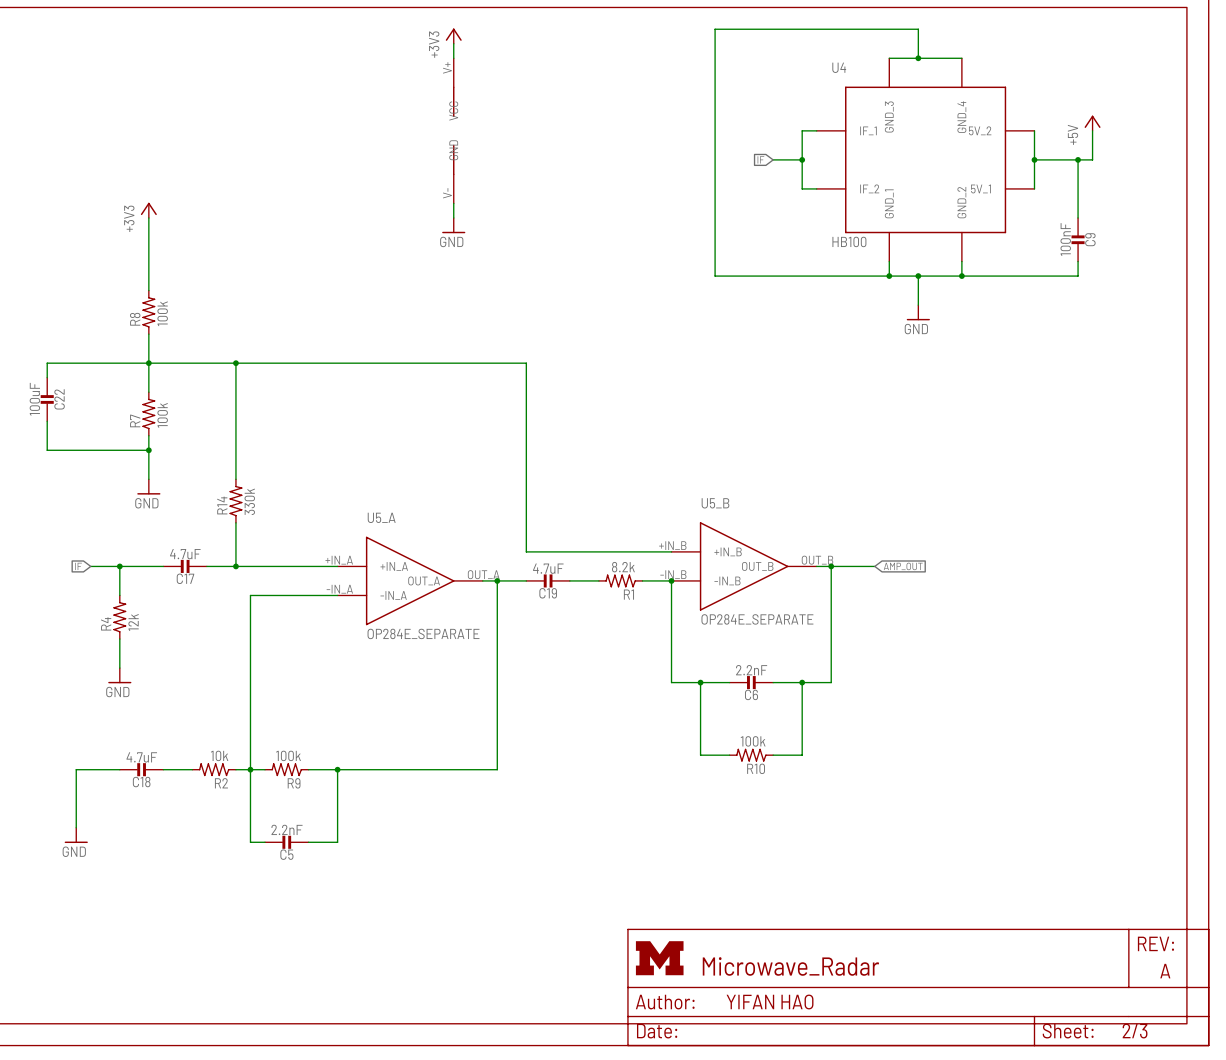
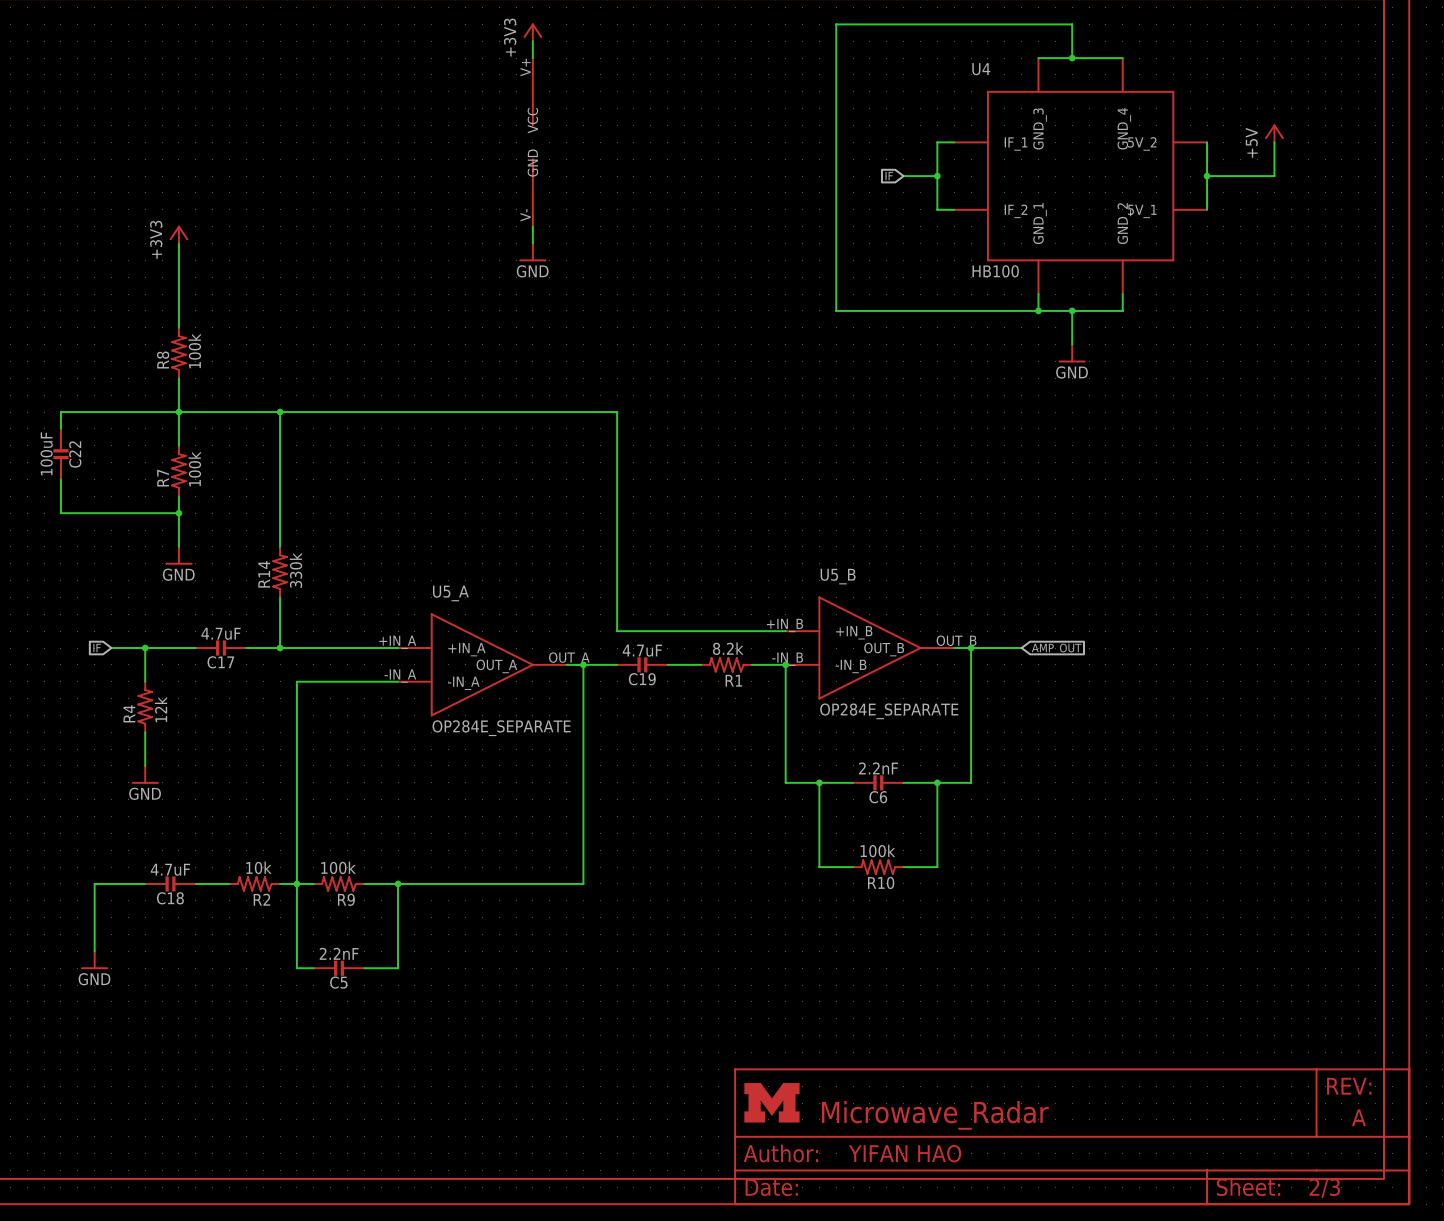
wire: (1078, 159) (1078, 217) -> none
junction: (1078, 159) -> none
C9: 100nF (1078, 239) -> none
wire: (1078, 261) (1078, 276) (961, 276) -> none
junction: (961, 276) -> none

